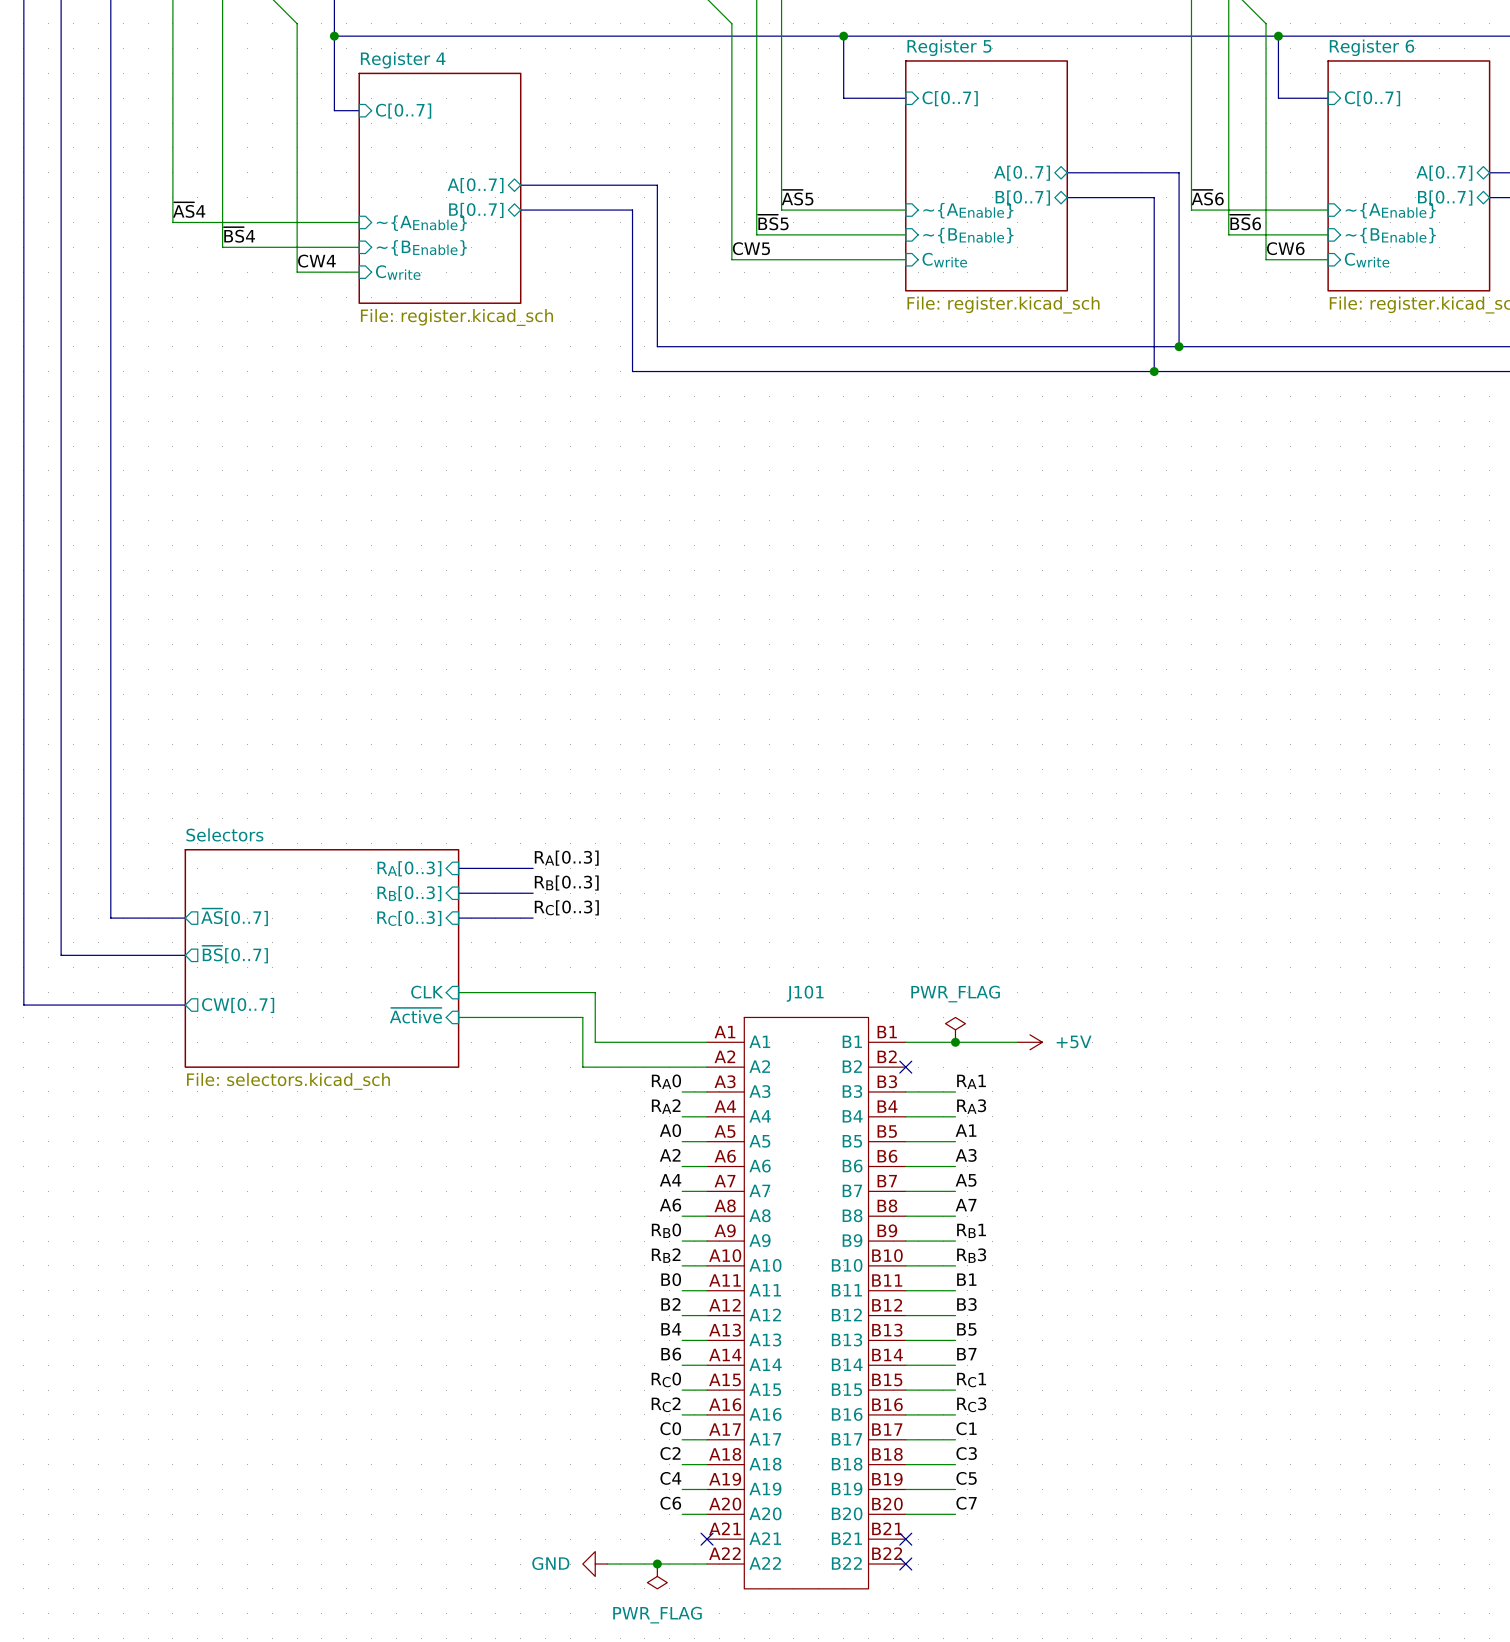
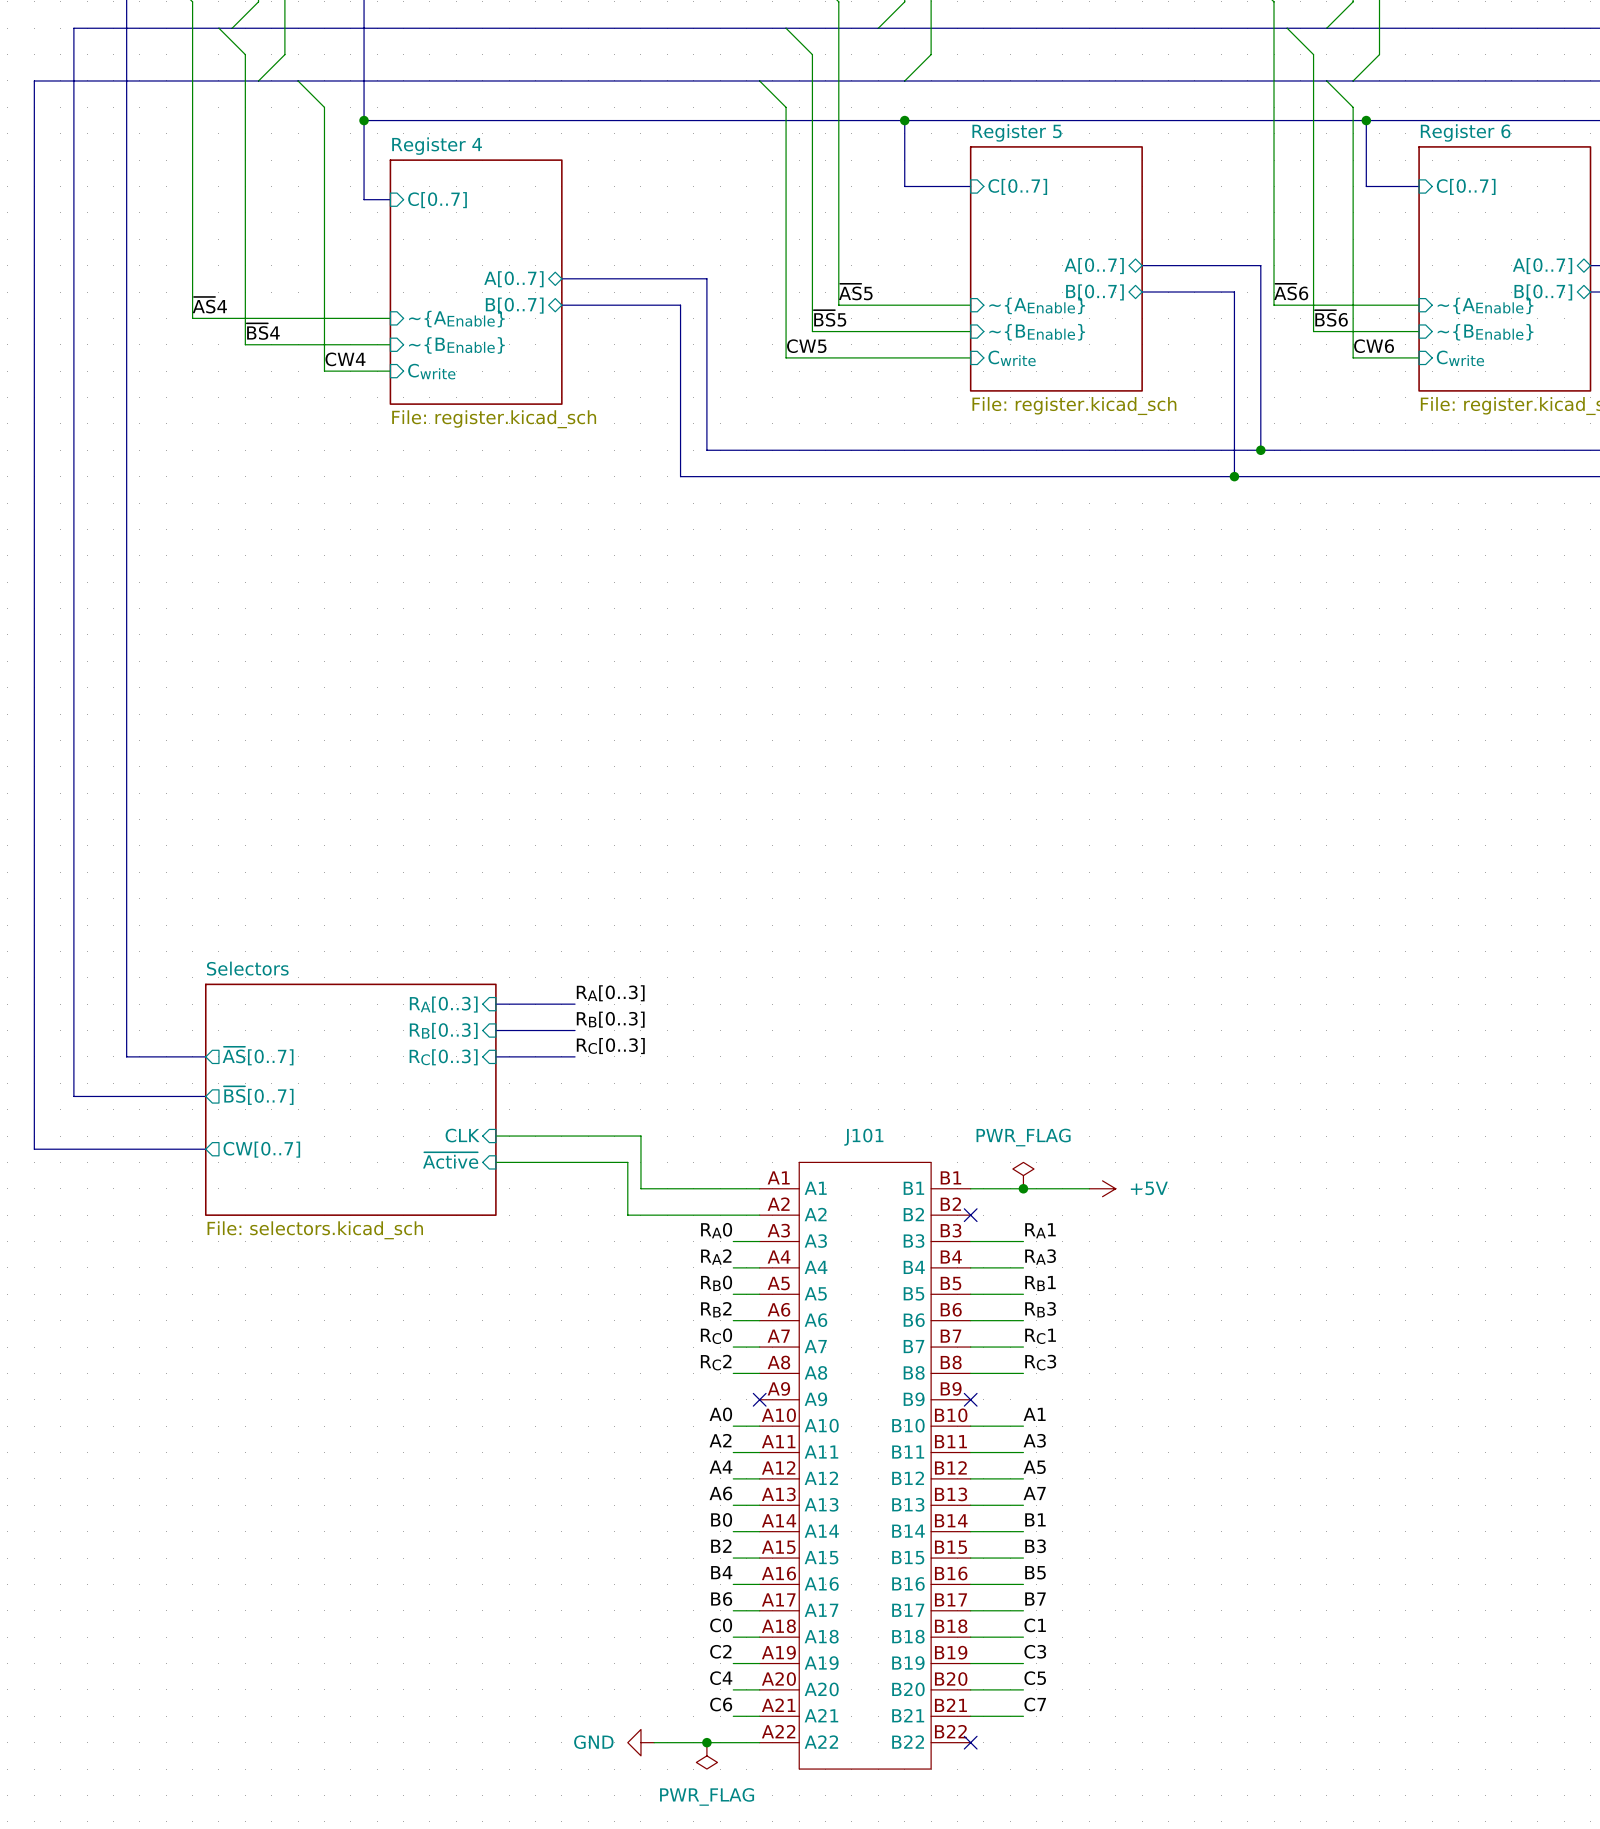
label: A0 (670, 1130) -> RB0 (716, 1283)
label: A1 (966, 1130) -> RB1 (1040, 1283)
label: A2 (670, 1155) -> RB2 (716, 1309)
label: A3 (966, 1155) -> RB3 (1040, 1309)
label: A4 (670, 1180) -> RC0 (716, 1336)
label: A5 (966, 1180) -> RC1 (1040, 1336)
label: A6 (670, 1205) -> RC2 (716, 1362)
label: A7 (966, 1205) -> RC3 (1040, 1362)
label: RB0 (666, 1230) -> none
label: RB1 (971, 1230) -> none
wire: (682, 1241) (707, 1241) -> none
no-connect mark: none -> (759, 1399)
wire: (905, 1241) (955, 1241) -> none
no-connect mark: none -> (970, 1399)
label: RB2 (666, 1255) -> A0 (720, 1414)
label: RB3 (971, 1255) -> A1 (1034, 1414)
label: B0 (671, 1279) -> A2 (720, 1440)
label: B1 (966, 1279) -> A3 (1034, 1440)
label: B2 (670, 1304) -> A4 (720, 1467)
label: B3 (966, 1304) -> A5 (1034, 1467)
label: B4 (671, 1329) -> A6 (720, 1493)
label: B5 (966, 1329) -> A7 (1034, 1493)
label: B6 (671, 1354) -> B0 (721, 1519)
label: B7 (966, 1354) -> B1 (1035, 1519)
label: RC0 (666, 1379) -> B2 (721, 1546)
label: RC1 (971, 1380) -> B3 (1035, 1546)
label: RC2 (666, 1404) -> B4 (721, 1572)
label: RC3 (971, 1404) -> B5 (1035, 1572)
label: C0 (670, 1428) -> B6 (721, 1599)
label: C1 (966, 1428) -> B7 (1035, 1599)
label: C2 (670, 1453) -> C0 (721, 1625)
label: C3 (966, 1453) -> C1 (1035, 1625)
label: C4 (670, 1478) -> C2 (720, 1651)
label: C5 (966, 1478) -> C3 (1035, 1651)
label: C6 (670, 1503) -> C4 (721, 1678)
label: C7 (966, 1503) -> C5 (1035, 1678)
label: none -> C6 (721, 1704)
label: none -> C7 (1035, 1704)
wire: none -> (733, 1716) (759, 1716)
no-connect mark: (707, 1539) -> none
wire: none -> (970, 1716) (1023, 1716)
no-connect mark: (905, 1539) -> none

